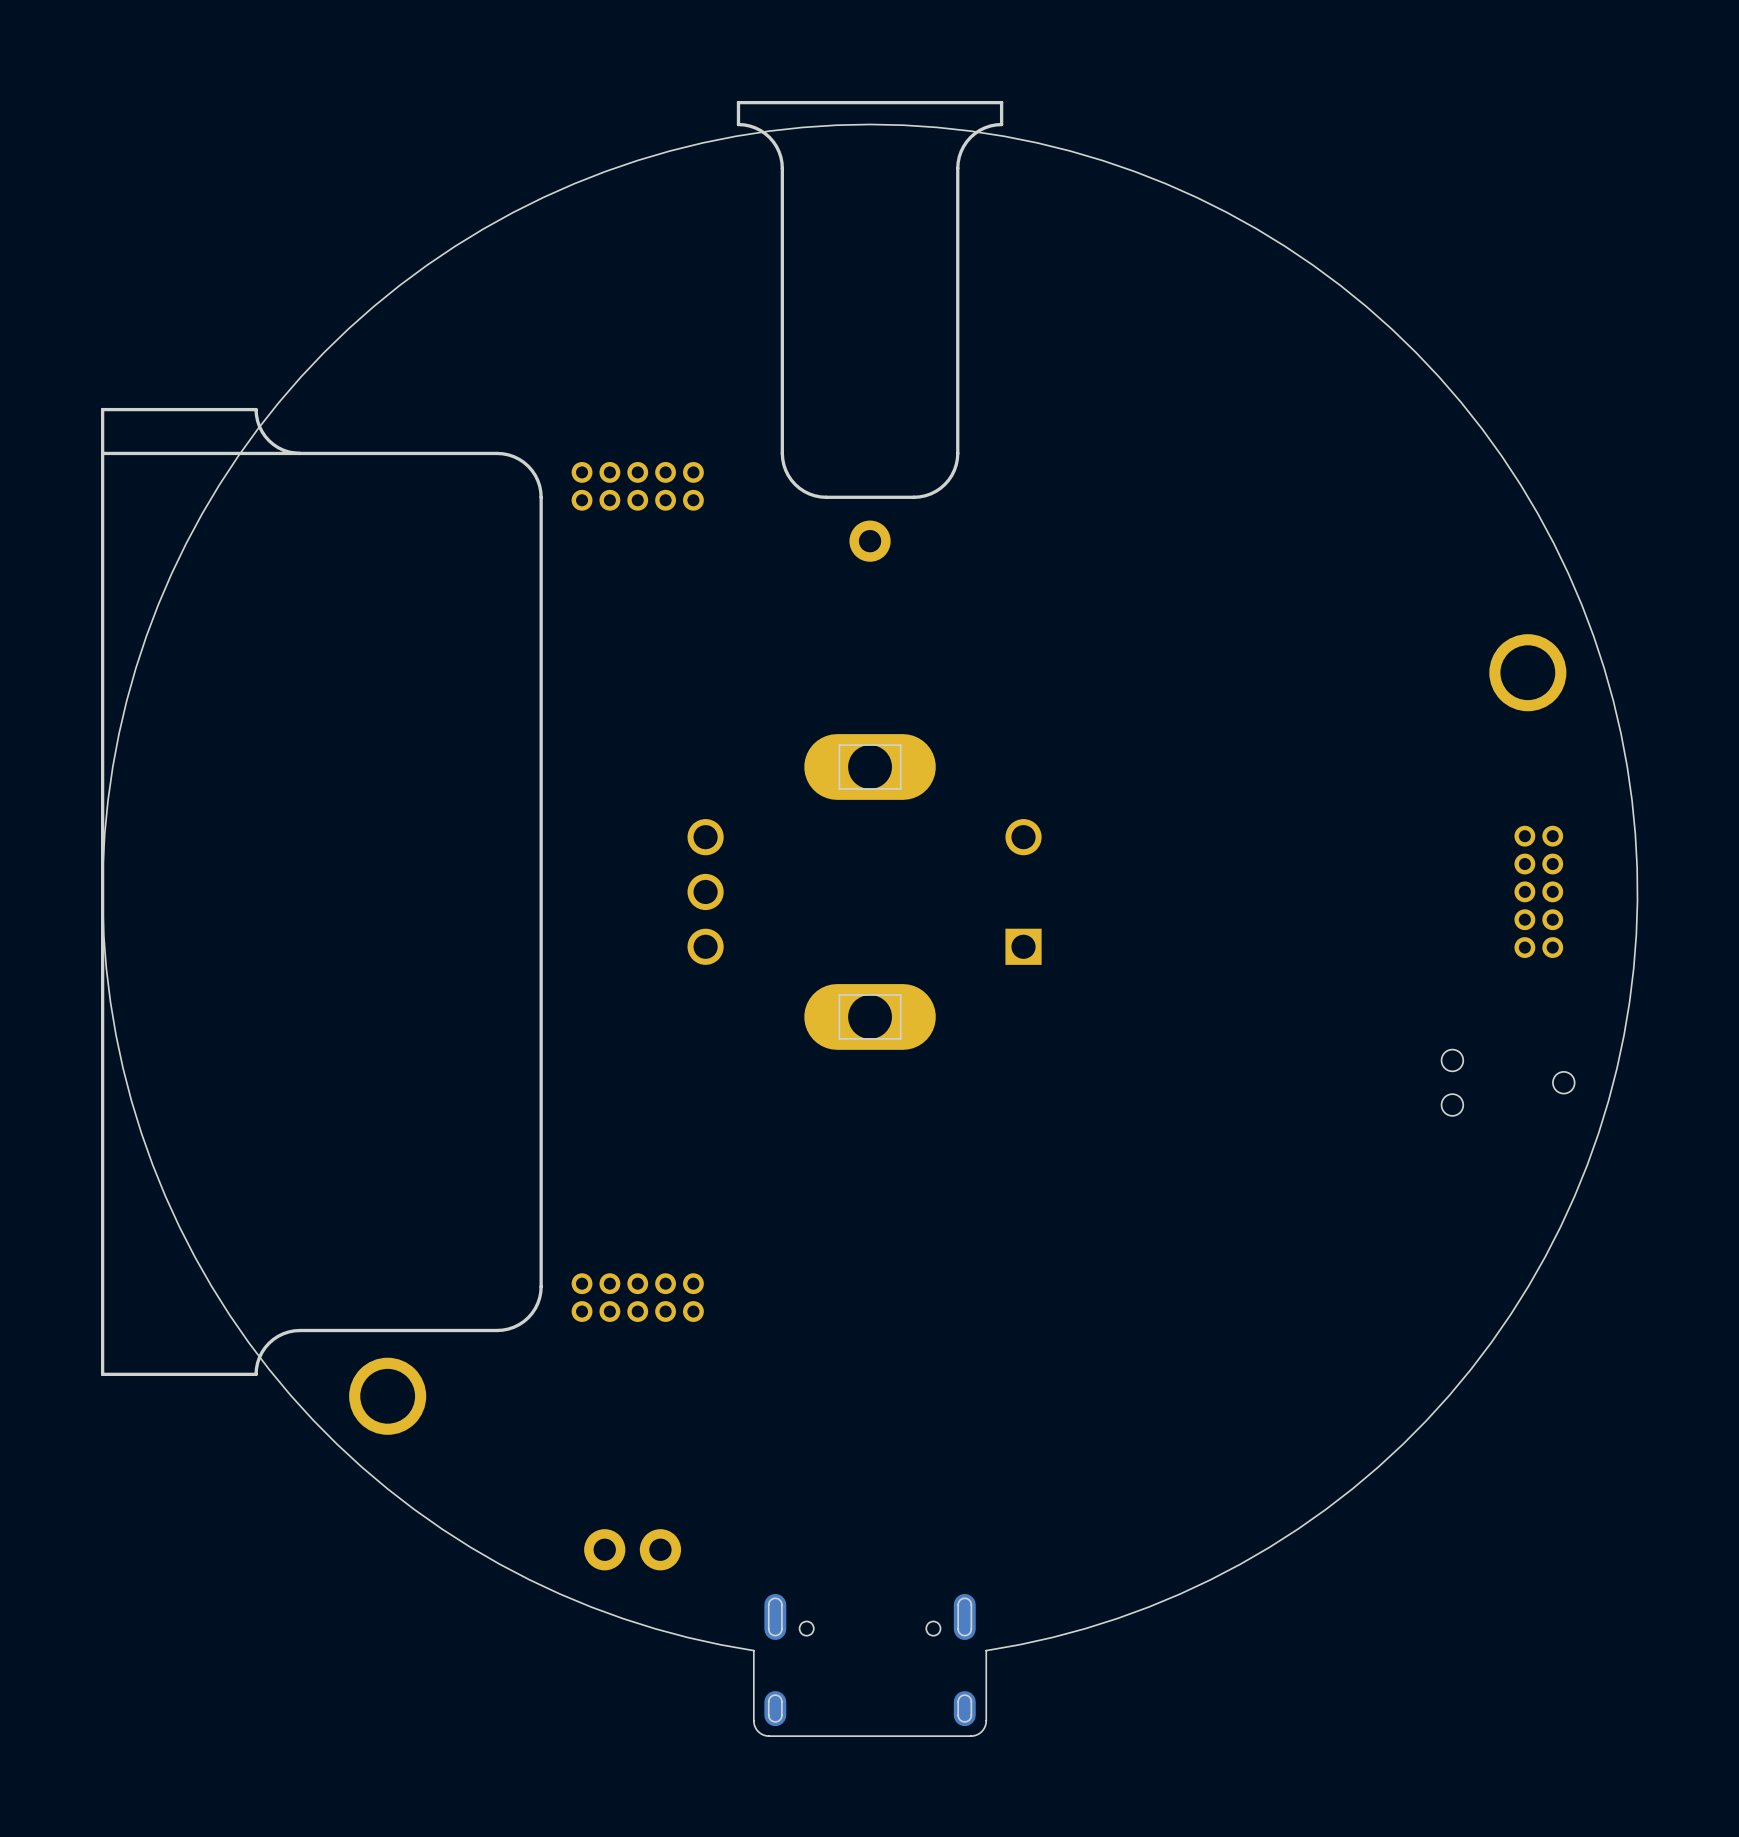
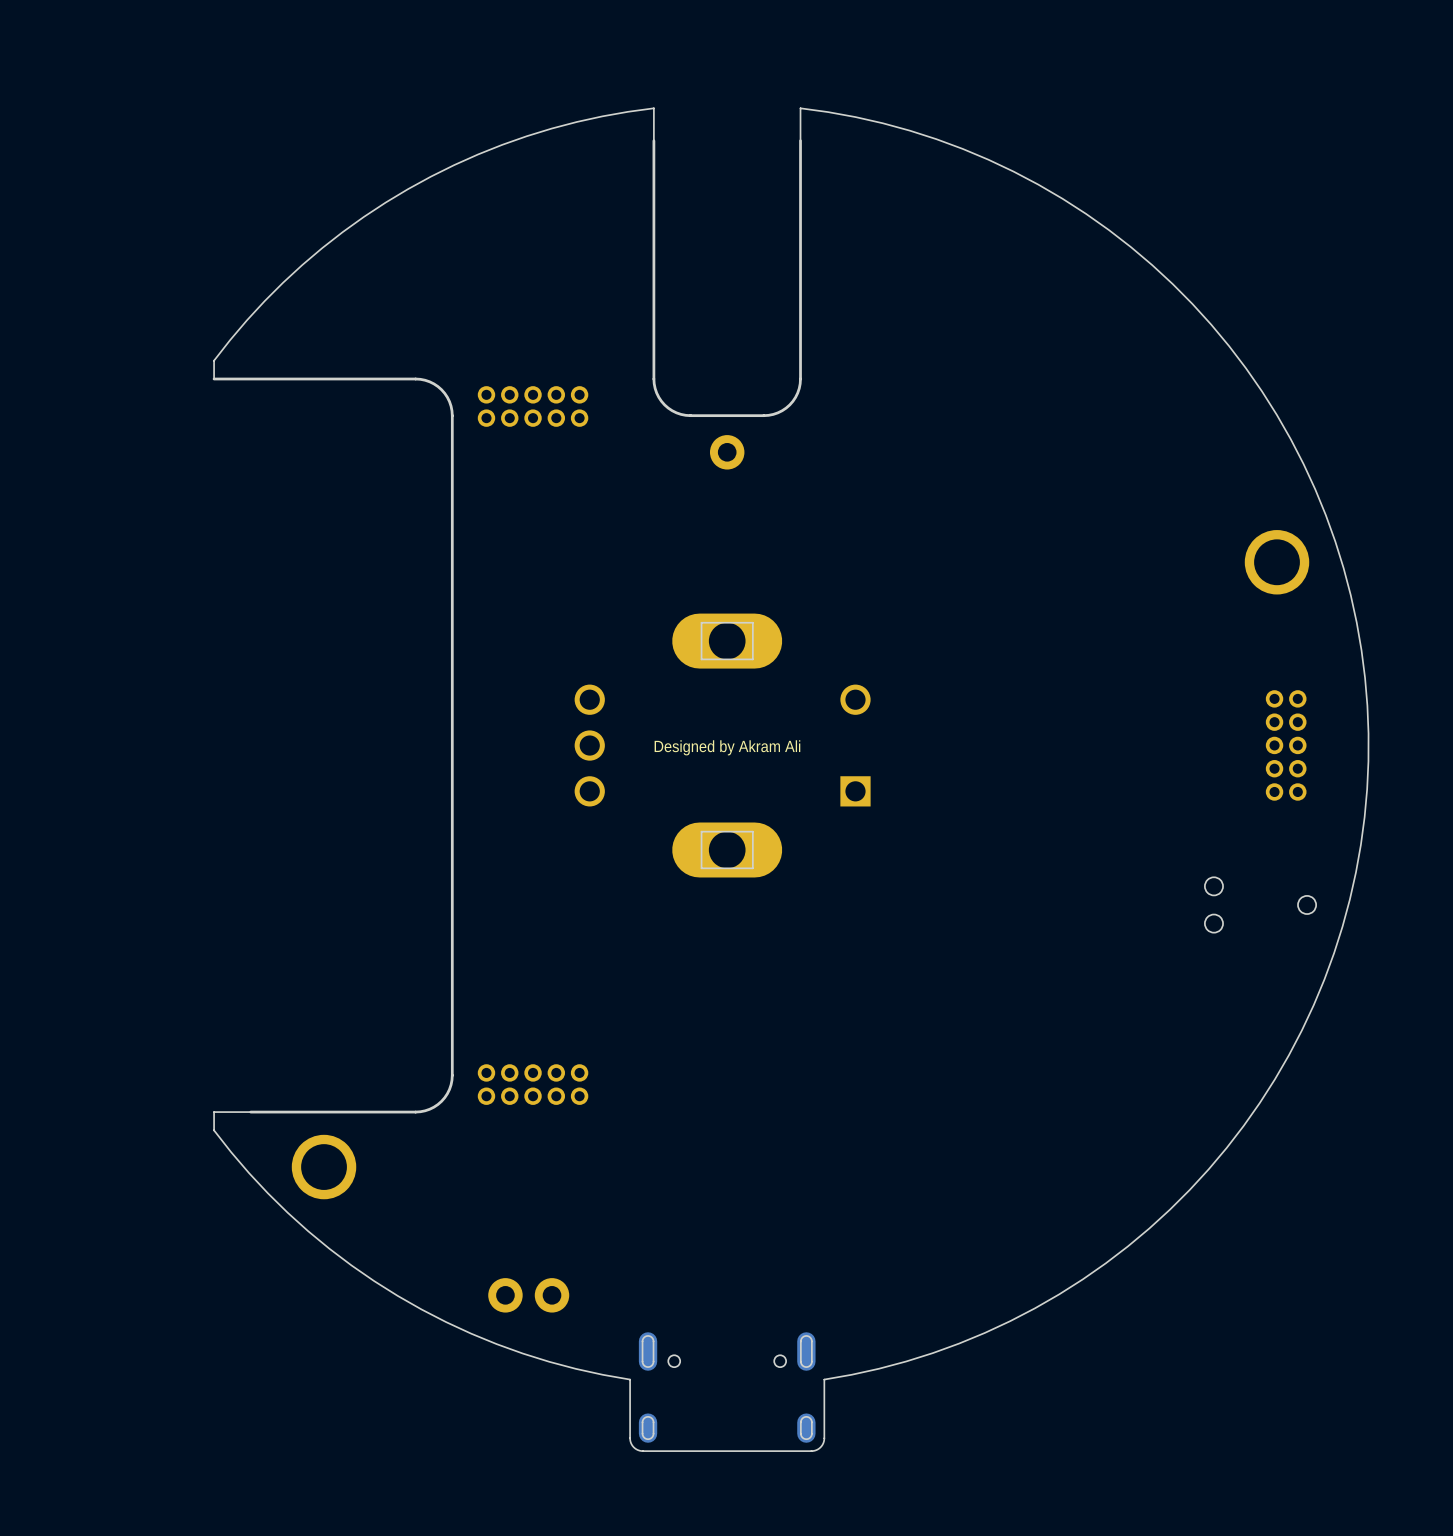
board edge: (957, 168) (961, 151) (970, 137) (984, 127) (1001, 124) (1001, 102) (738, 102) (738, 124) (755, 127) (769, 137) (779, 151) (782, 168) -> (800, 140) (800, 108) (882, 123) (962, 148) (1038, 184) (1086, 213) (1152, 265) (1192, 303) (1229, 346) (1261, 391) (1290, 439) (1315, 489) (1335, 541) (1350, 595) (1365, 677) (1368, 733) (1367, 789) (1360, 844) (1342, 926) (1324, 979) (1301, 1030) (1274, 1079) (1243, 1125) (1208, 1169) (1169, 1209) (1127, 1246) (1082, 1279) (1035, 1308) (984, 1332) (932, 1353) (879, 1368) (824, 1379)
board edge: (256, 453) (102, 453) -> (214, 379) (214, 360) (247, 320) (283, 282) (342, 232) (385, 202) (430, 176) (478, 154) (526, 136) (576, 121) (628, 111) (653, 108) (653, 140)
board edge: (299, 453) (283, 450) (268, 440) (259, 426) (256, 409) (102, 409) (102, 1374) (256, 1374) (259, 1357) (268, 1343) (283, 1333) (299, 1330) -> none
text: none -> Designed by Akram Ali (727, 747)
board edge: (986, 1650) (1052, 1637) (1117, 1618) (1180, 1594) (1240, 1564) (1325, 1509) (1378, 1467) (1426, 1420) (1470, 1369) (1510, 1314) (1545, 1256) (1574, 1196) (1598, 1133) (1624, 1035) (1633, 968) (1637, 901) (1635, 833) (1627, 766) (1604, 668) (1581, 604) (1553, 543) (1520, 484) (1482, 428) (1439, 377) (1391, 329) (1340, 285) (1256, 228) (1196, 197) (1134, 171) (1070, 151) (1004, 136) (937, 127) (870, 124) (802, 127) (735, 136) (669, 151) (605, 171) (543, 197) (483, 228) (399, 285) (348, 329) (300, 377) (257, 428) (219, 484) (186, 543) (158, 604) (135, 668) (112, 766) (104, 833) (102, 901) (106, 968) (116, 1035) (141, 1133) (165, 1196) (194, 1256) (229, 1314) (269, 1369) (313, 1420) (361, 1467) (414, 1509) (499, 1564) (560, 1594) (622, 1618) (687, 1637) (753, 1650) -> (250, 1112) (214, 1112) (214, 1130) (249, 1173) (287, 1212) (351, 1265) (397, 1295) (471, 1333) (549, 1361) (630, 1379)

